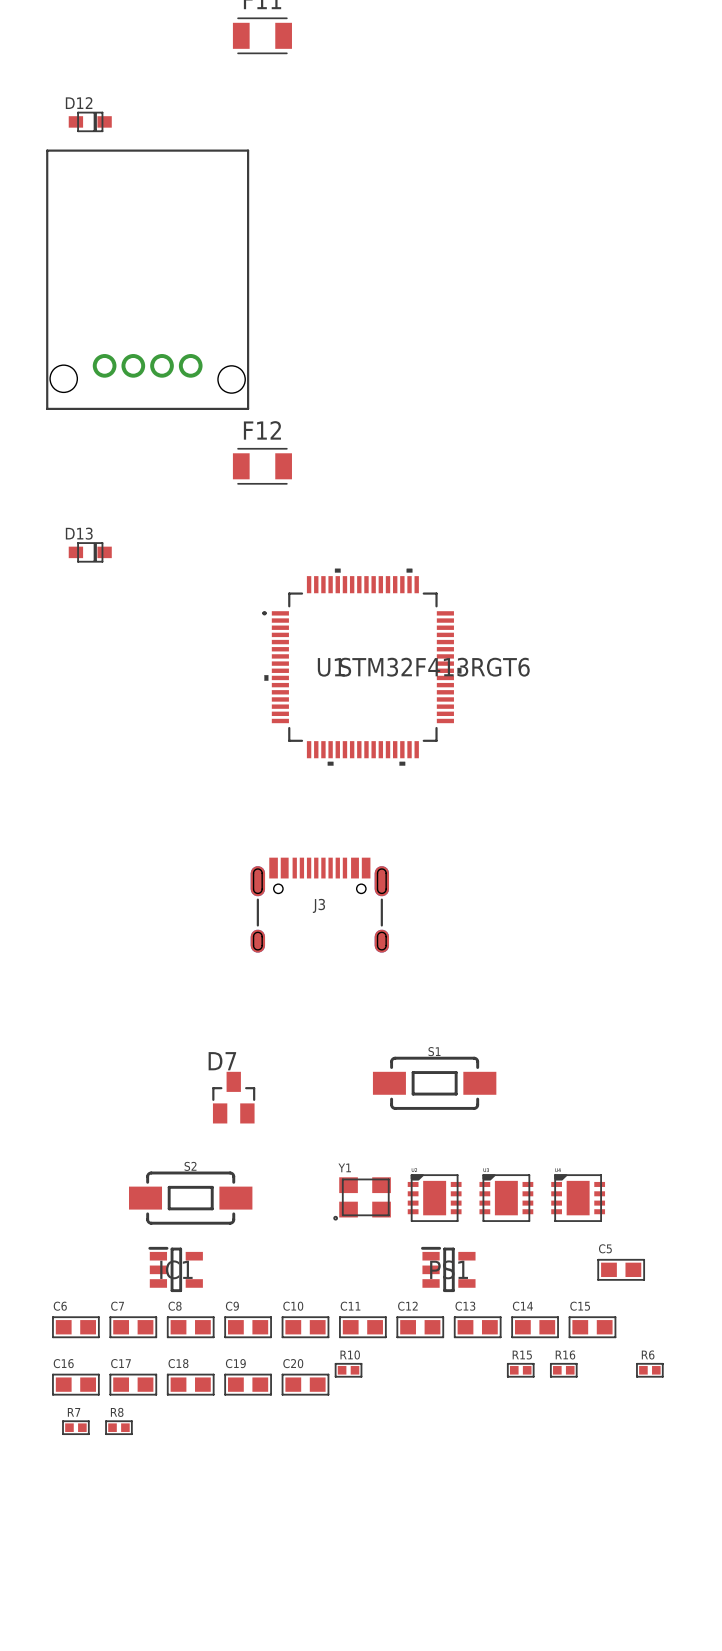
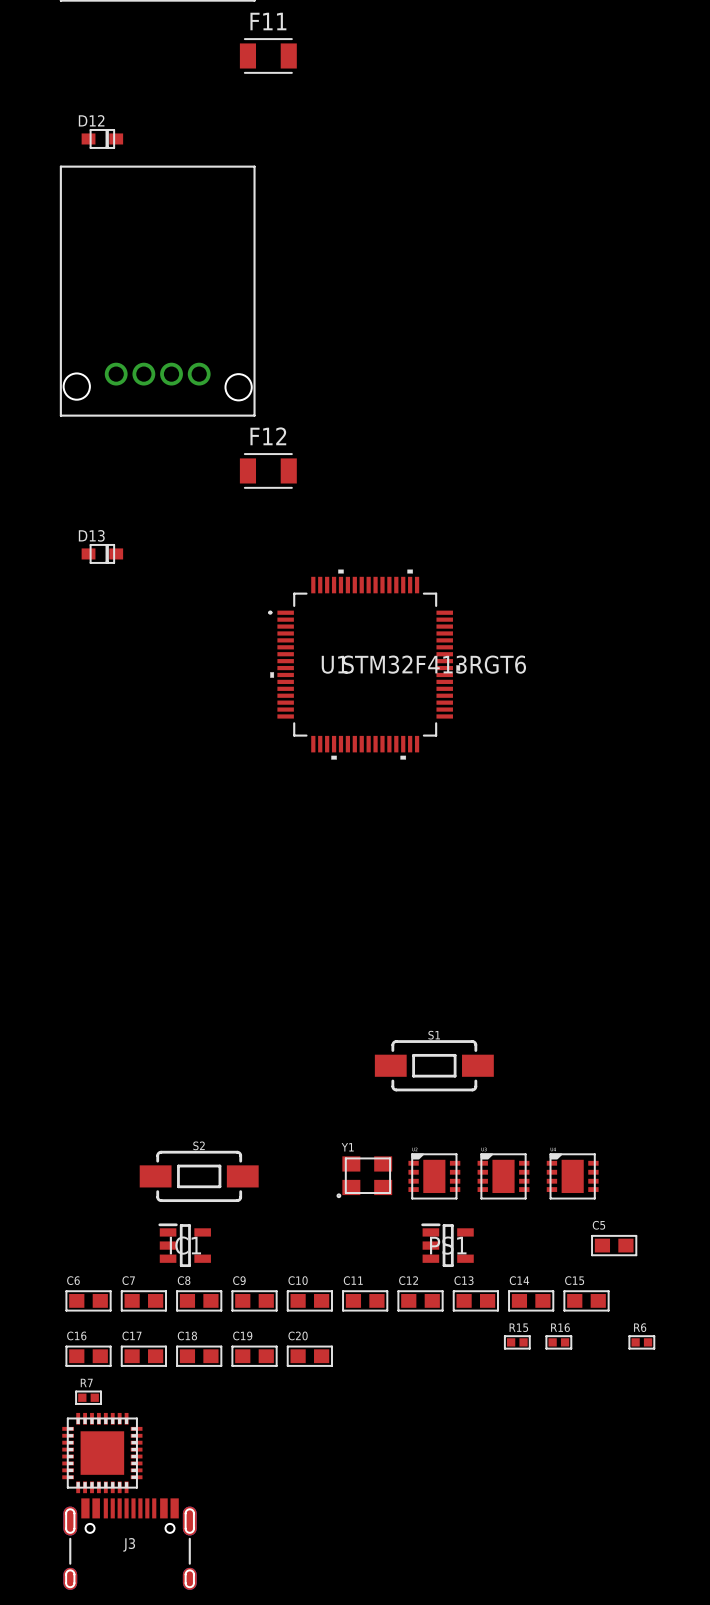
J3 position: (319, 905) -> (130, 1544)
D7: (233, 1097) -> none
R10: (348, 1370) -> none
R8: (118, 1427) -> none
part: none -> (102, 1453)

